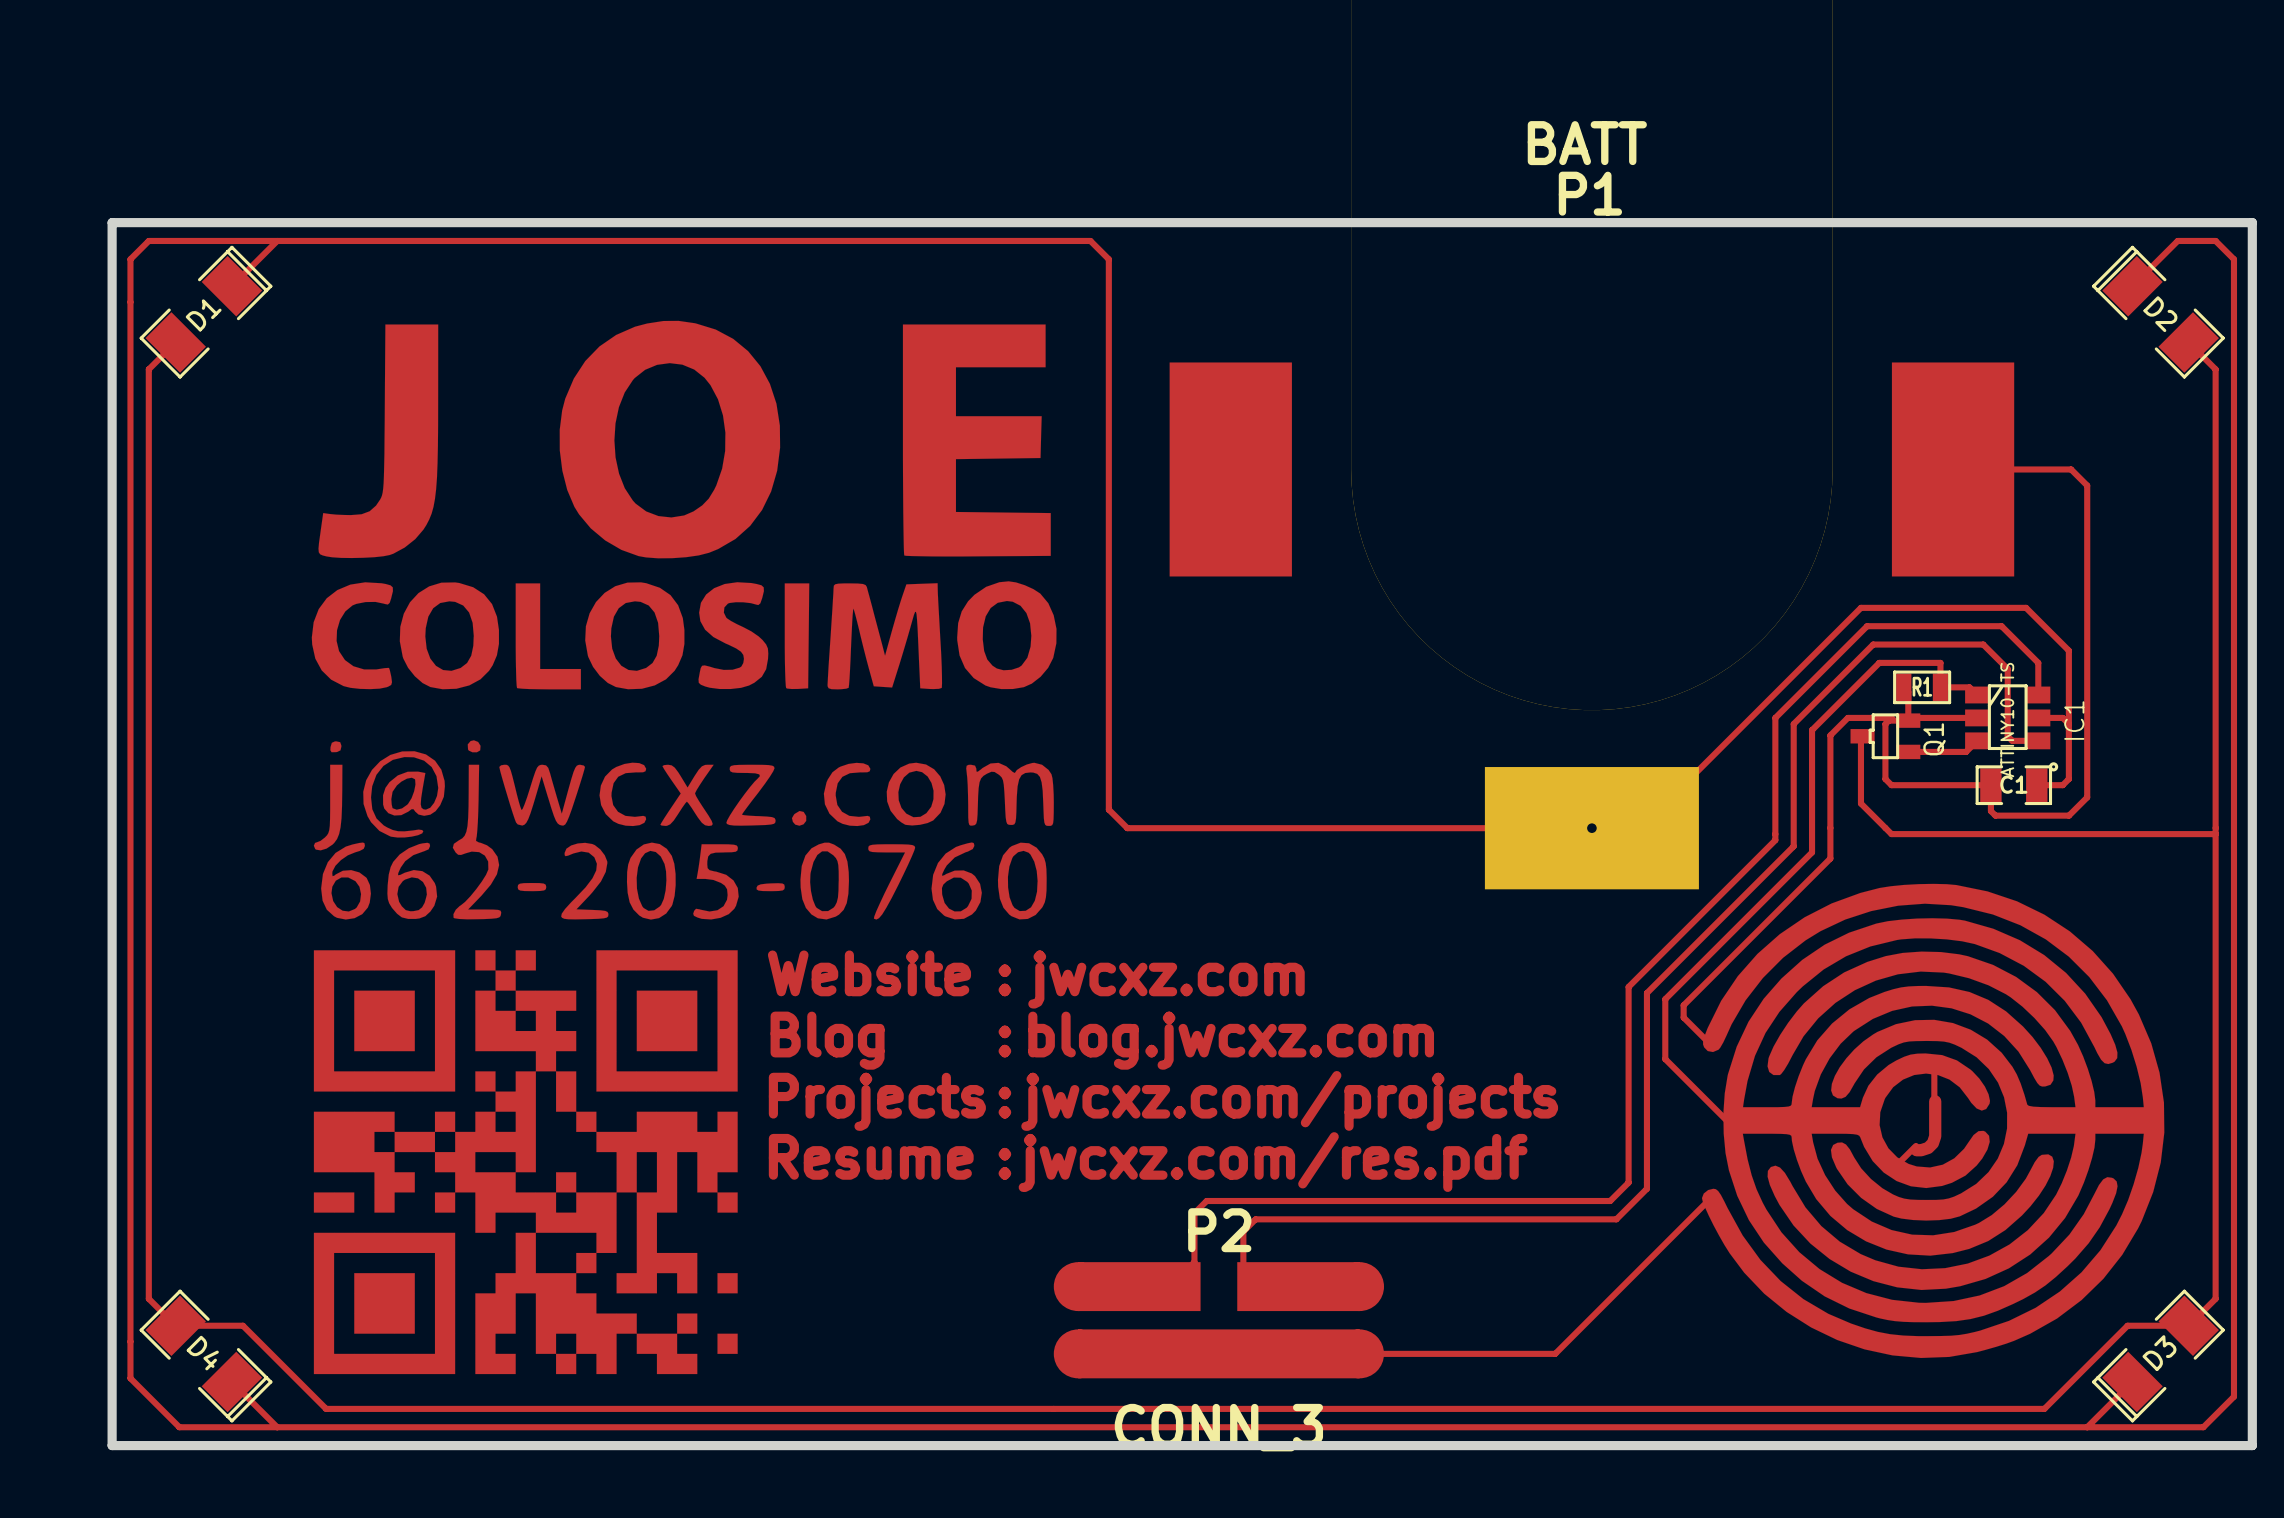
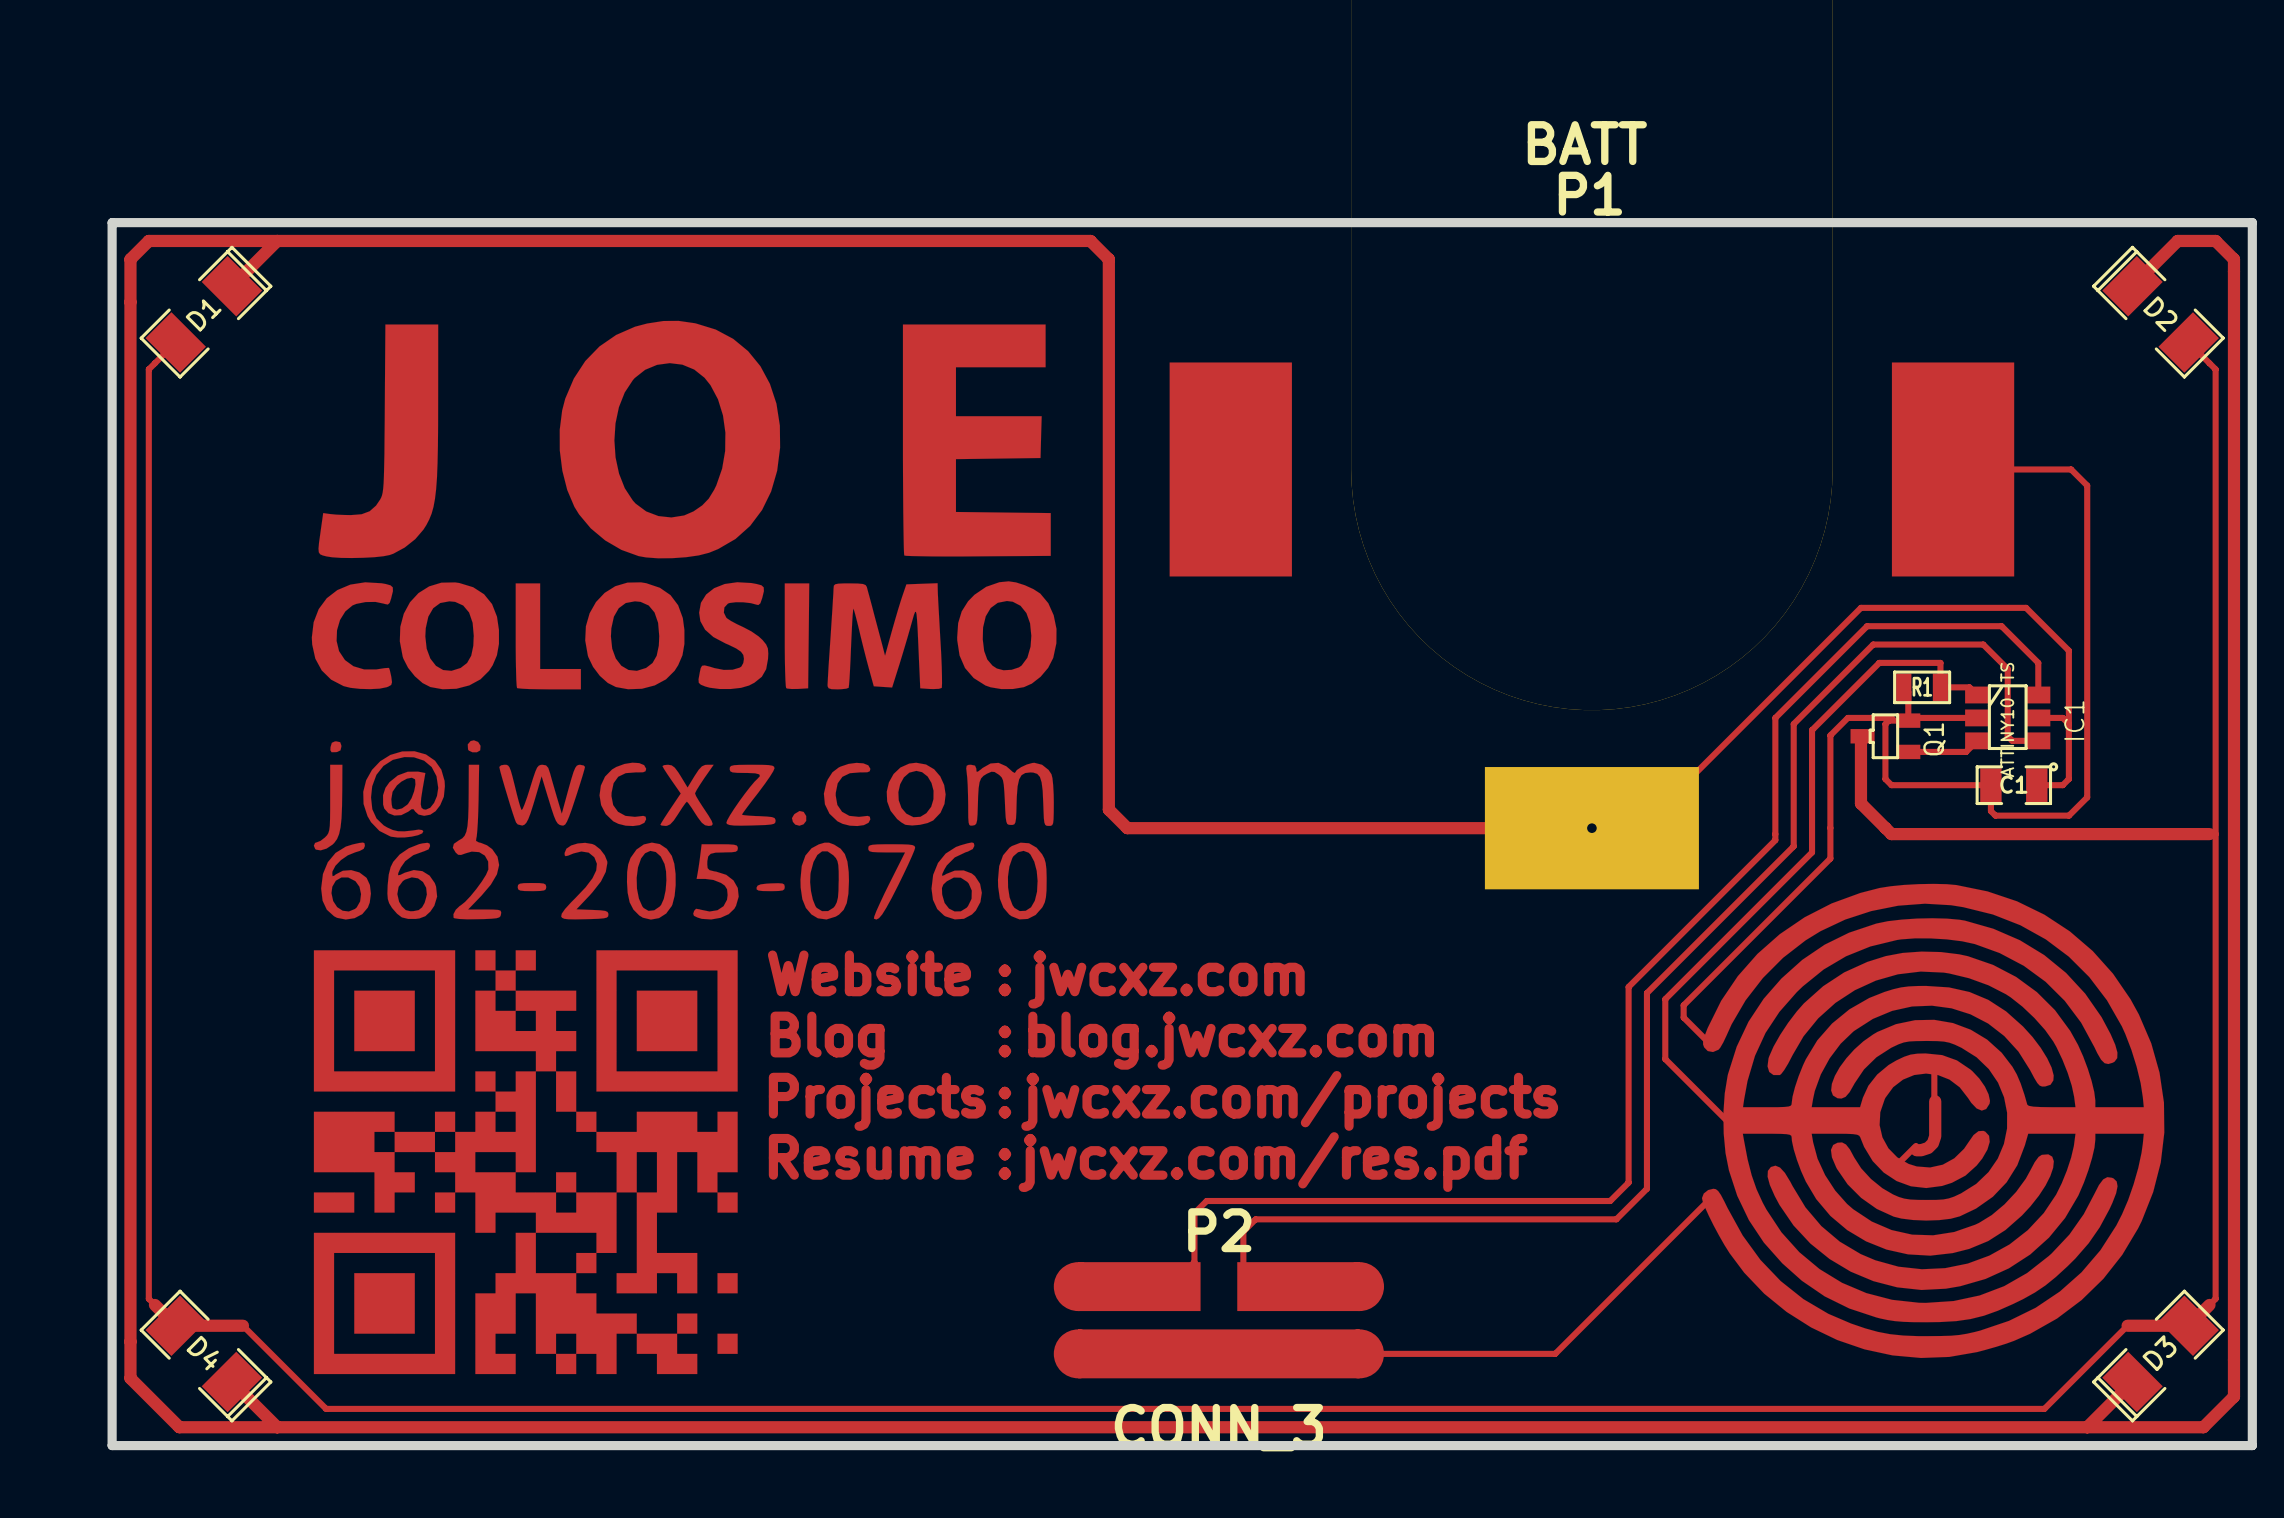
track width: thin (277, 240) (231, 286) -> thick (277, 240) (231, 286)
track width: thin (2132, 286) (2177, 240) (2215, 240) (2233, 259) (2233, 1396) (2203, 1427) (179, 1427) (130, 1378) (130, 259) (148, 240) (1090, 240) (1108, 259) (1108, 809) (1127, 828) (1591, 828) -> thick (2132, 286) (2177, 240) (2215, 240) (2233, 259) (2233, 1396) (2203, 1427) (179, 1427) (130, 1378) (130, 259) (148, 240) (1090, 240) (1108, 259) (1108, 809) (1127, 828) (1591, 828)
track width: thin (1862, 736) (1860, 737) (1860, 803) (1891, 834) (2209, 834) -> thick (1862, 736) (1860, 737) (1860, 803) (1891, 834) (2209, 834)
track width: thin (154, 1304) (175, 1325) (242, 1325) -> thick (154, 1304) (175, 1325) (242, 1325)
track width: thin (2209, 1304) (2188, 1325) (2127, 1325) -> thick (2209, 1304) (2188, 1325) (2127, 1325)
track width: thin (231, 1382) (277, 1427) -> thick (231, 1382) (277, 1427)
track width: thin (2132, 1382) (2087, 1427) -> thick (2132, 1382) (2087, 1427)

